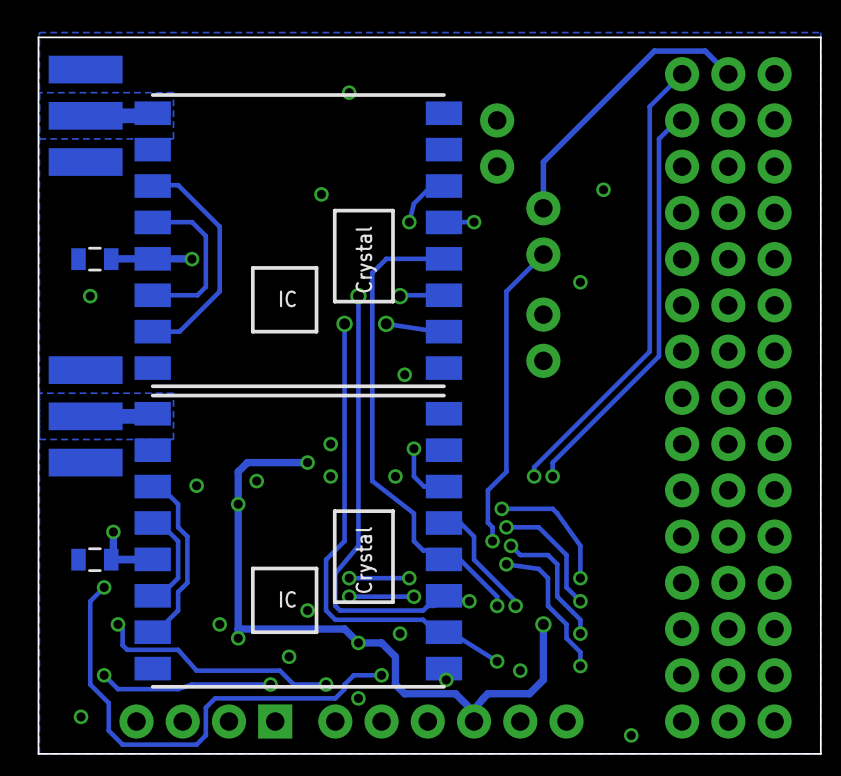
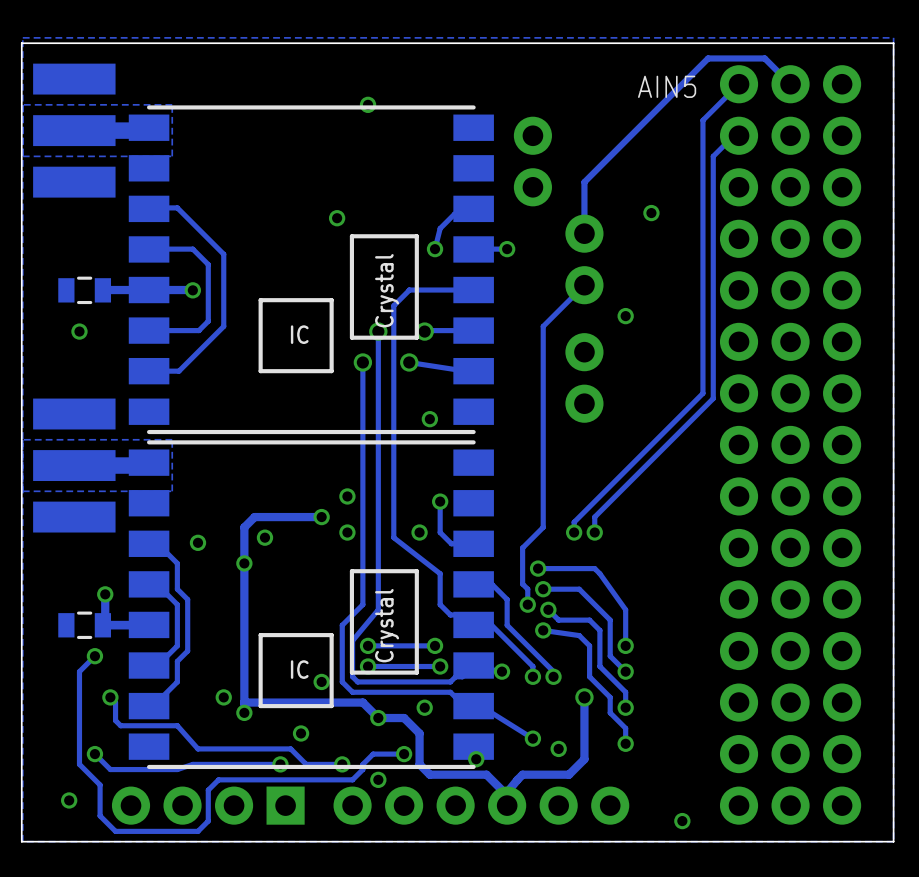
text: none -> AIN5 (667, 86)

